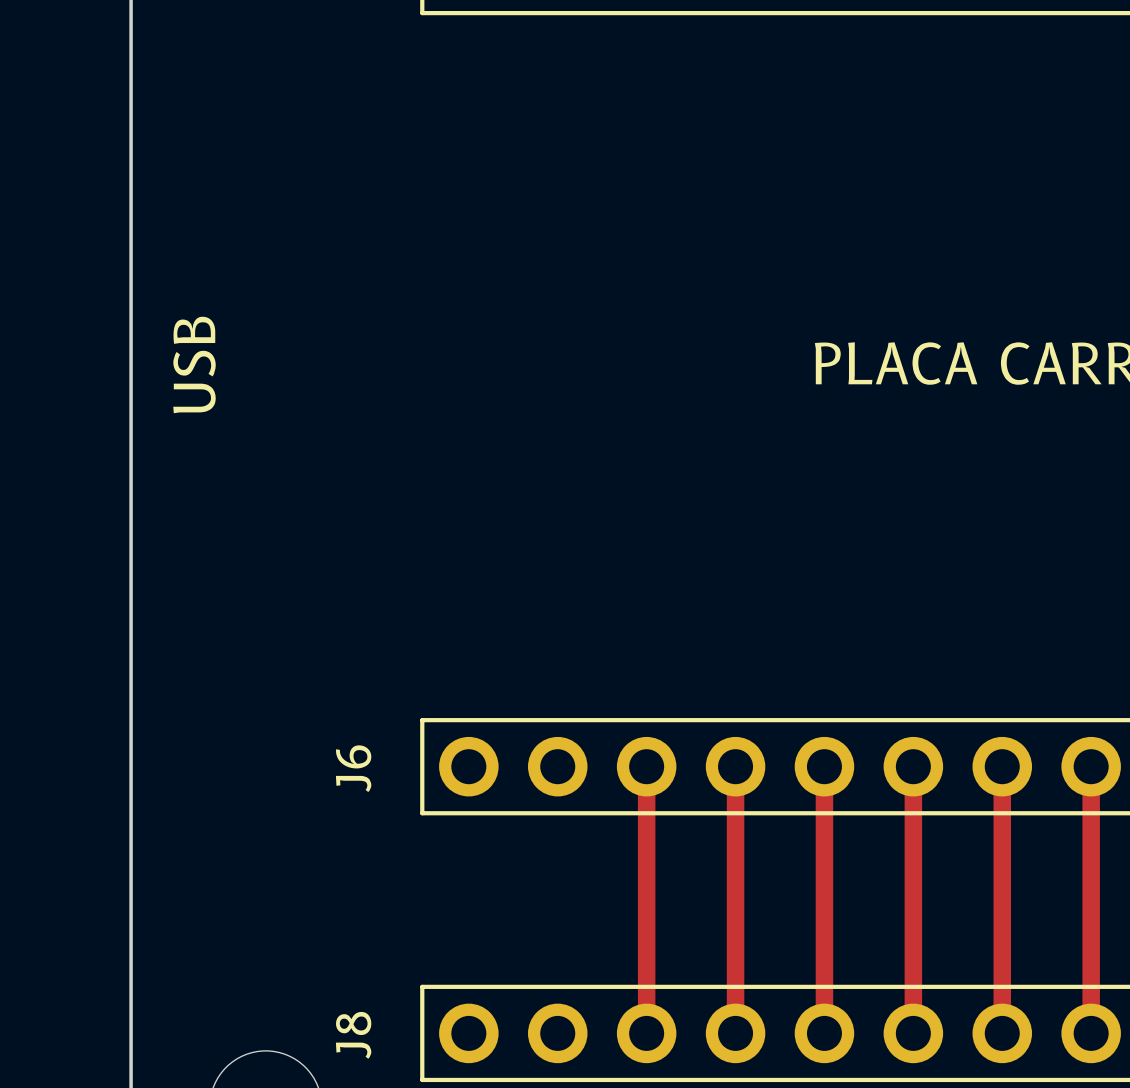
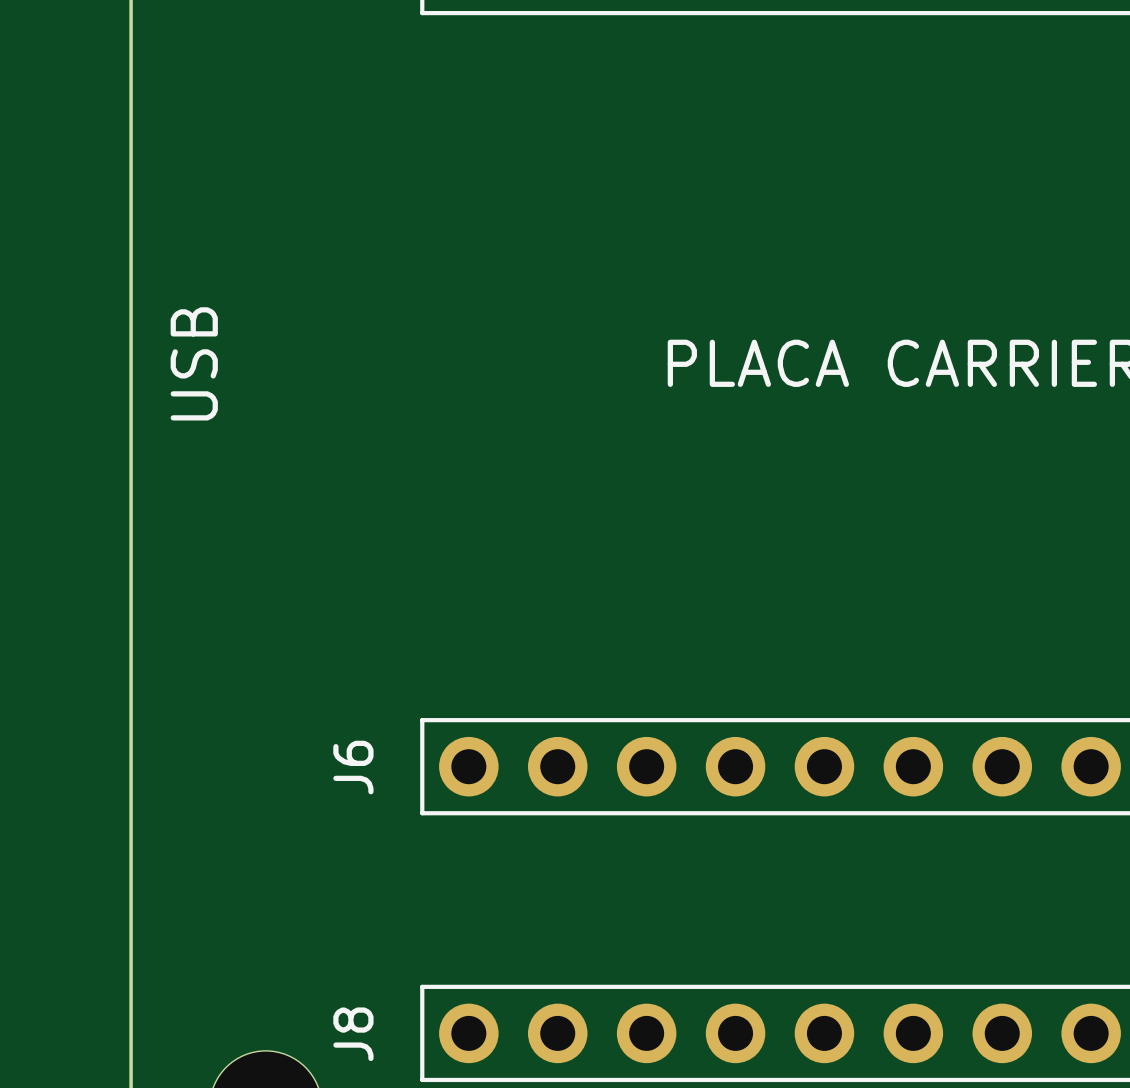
track: (646, 766) (646, 1033) -> none
track: (735, 766) (735, 1033) -> none
track: (824, 766) (824, 1033) -> none
track: (913, 766) (913, 1033) -> none
track: (1002, 766) (1002, 1033) -> none
track: (1091, 766) (1091, 1033) -> none

